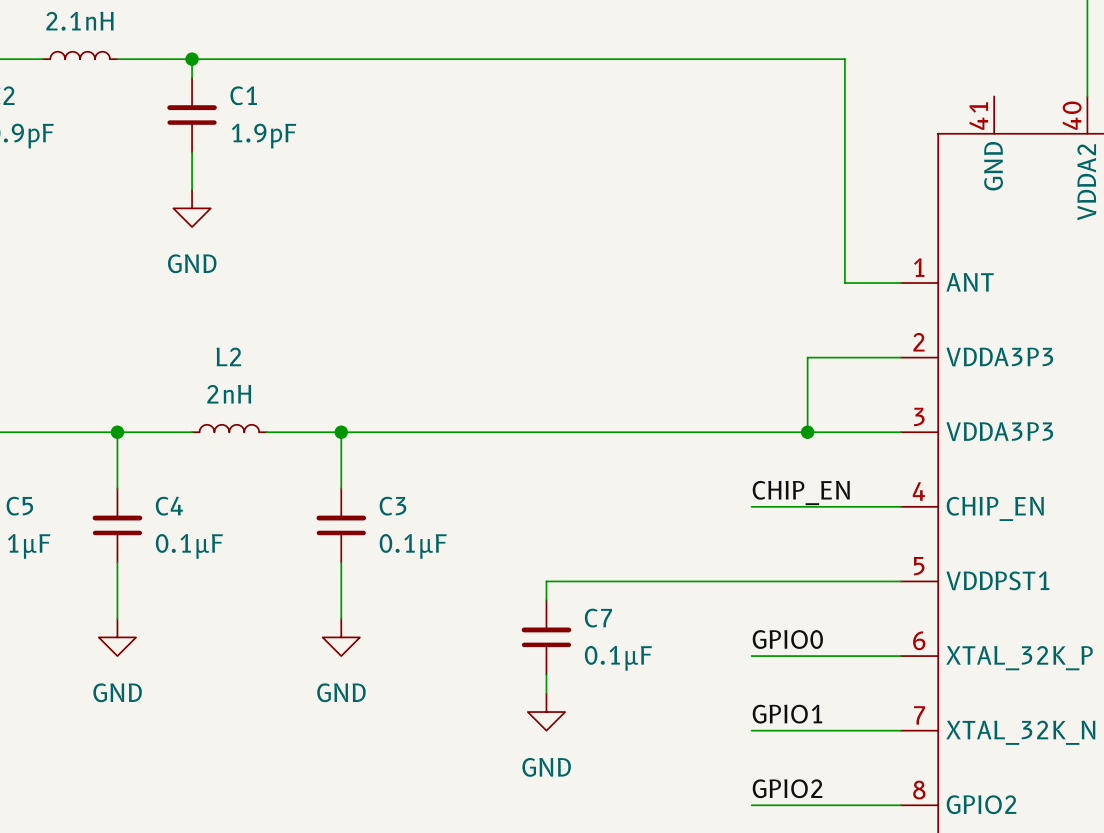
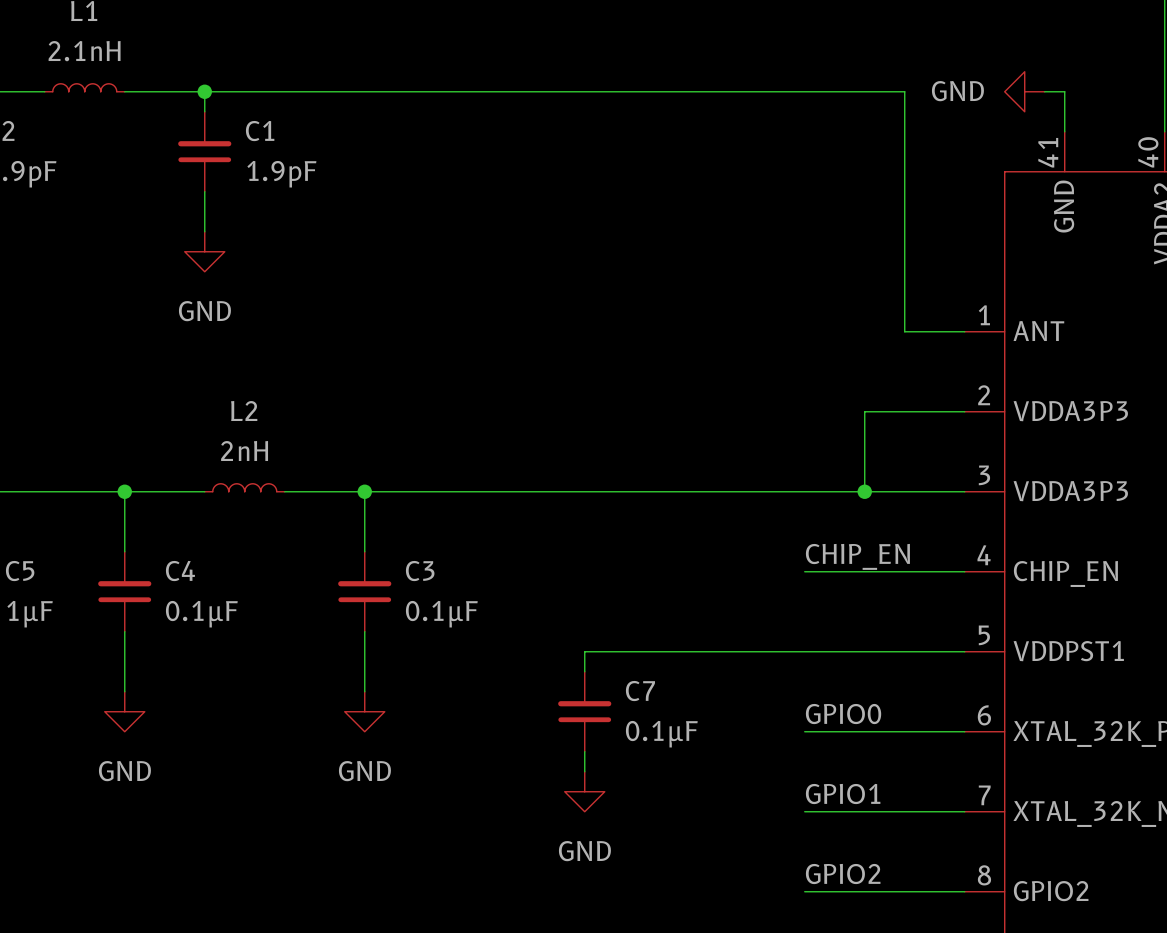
power symbol: none -> GND (1024, 91)
wire: none -> (1044, 91) (1064, 91) (1064, 131)

